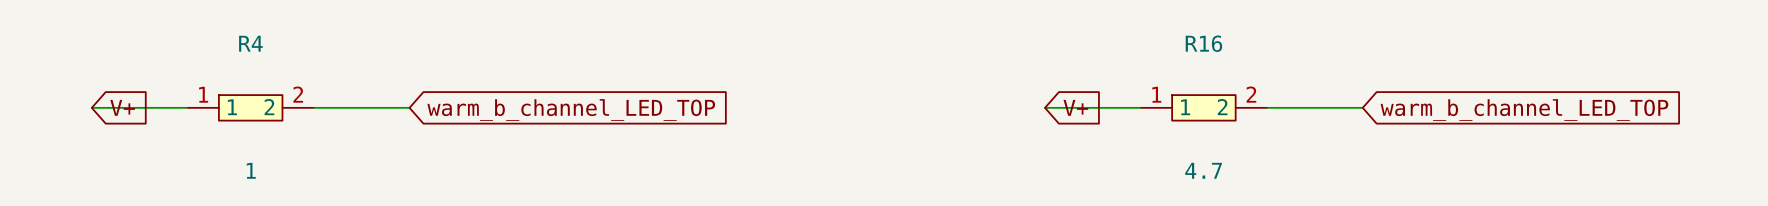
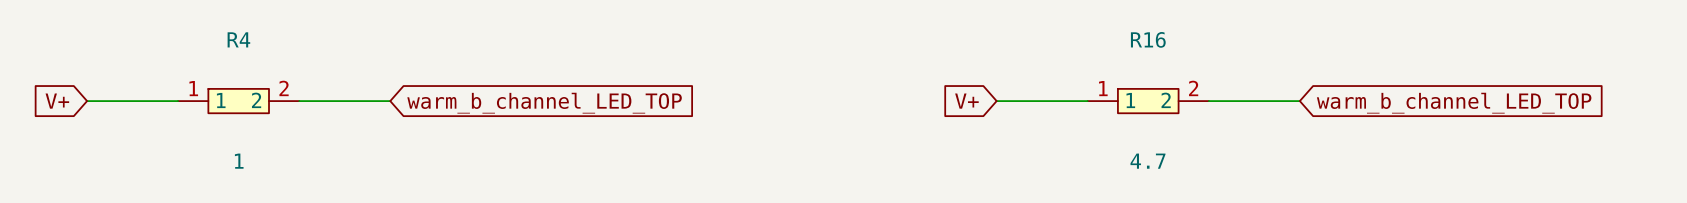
global label rotation: 0° (122, 107) -> 180° (57, 101)
global label position: V+ (122, 107) -> V+ (57, 101)
global label rotation: 0° (1075, 107) -> 180° (966, 101)

